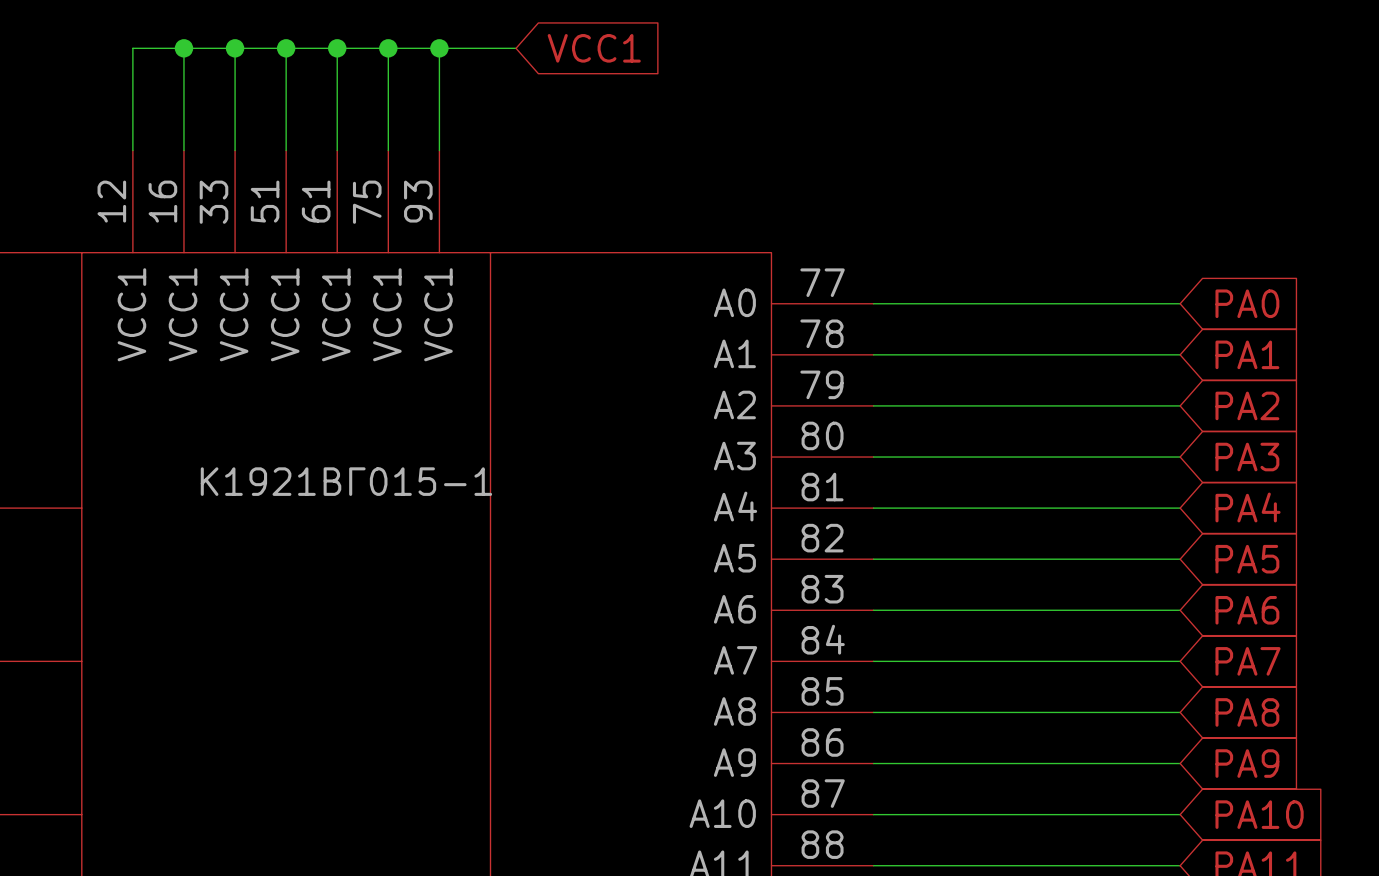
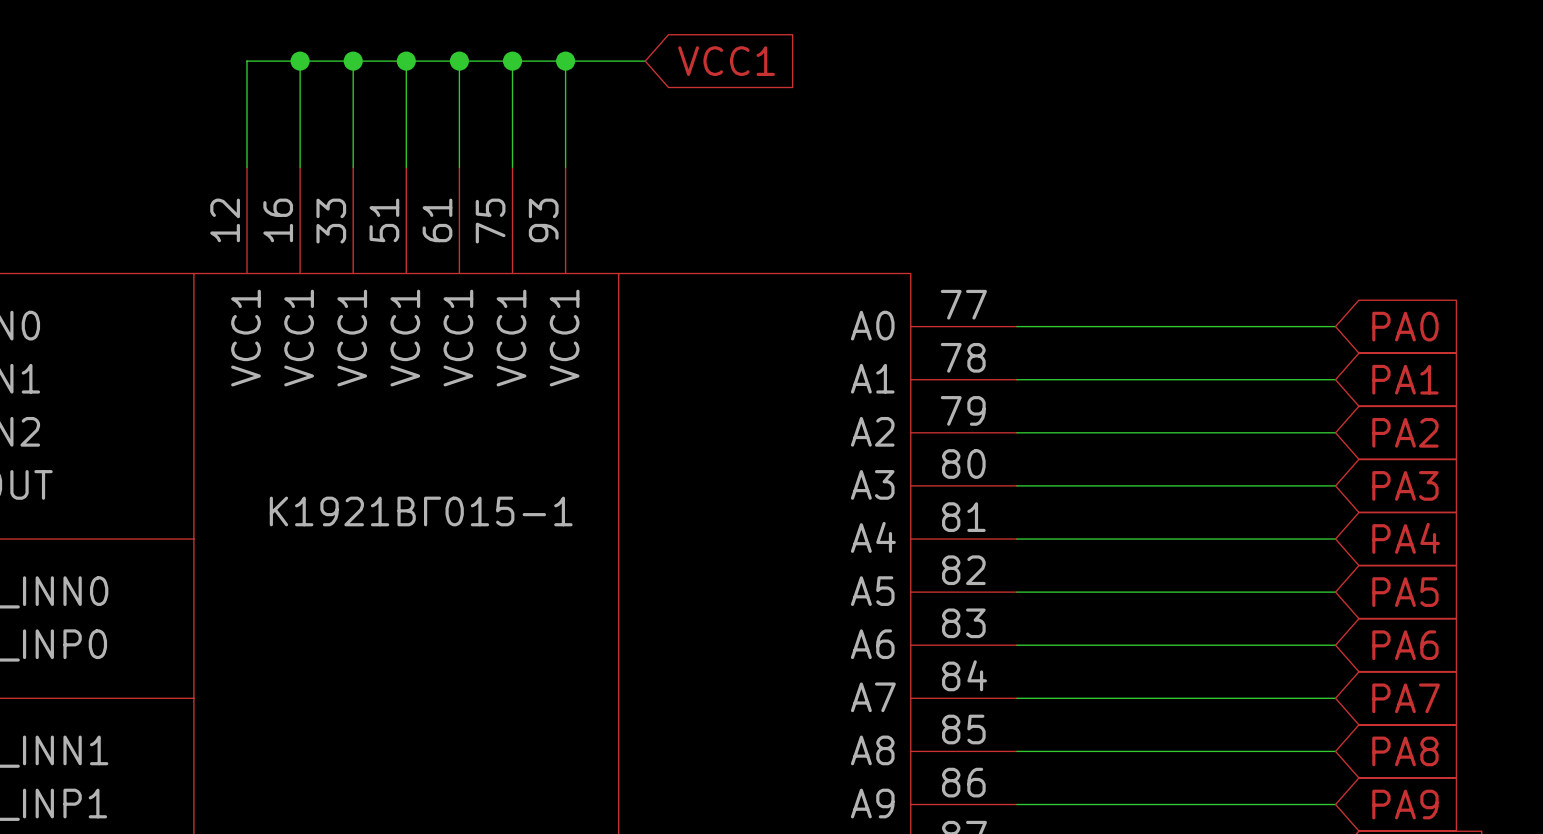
К1921ВГ015-1 name position: К1921ВГ015-1 (346, 481) -> К1921ВГ015-1 (421, 511)

